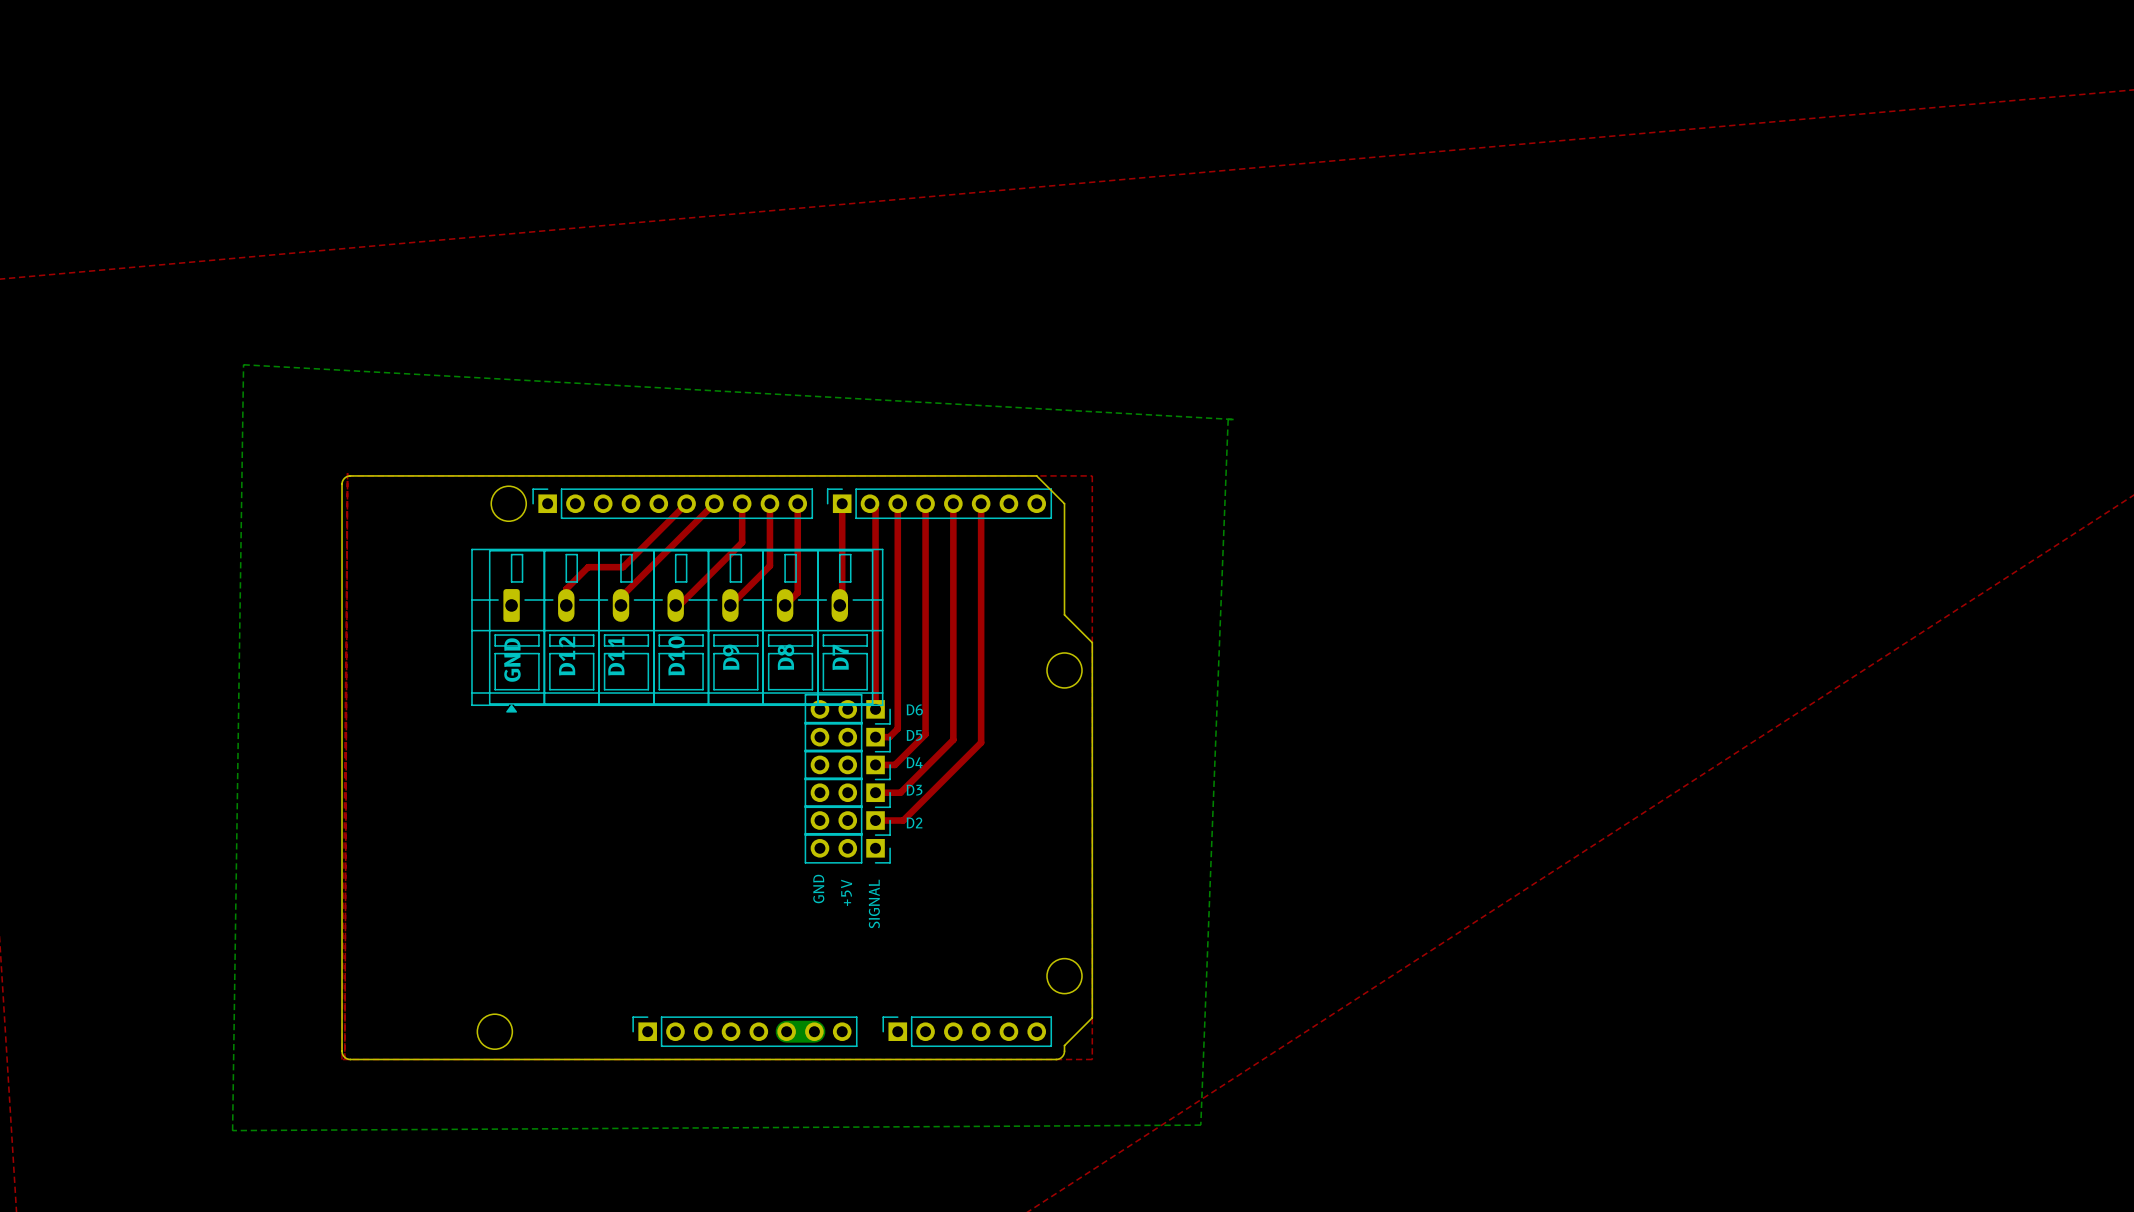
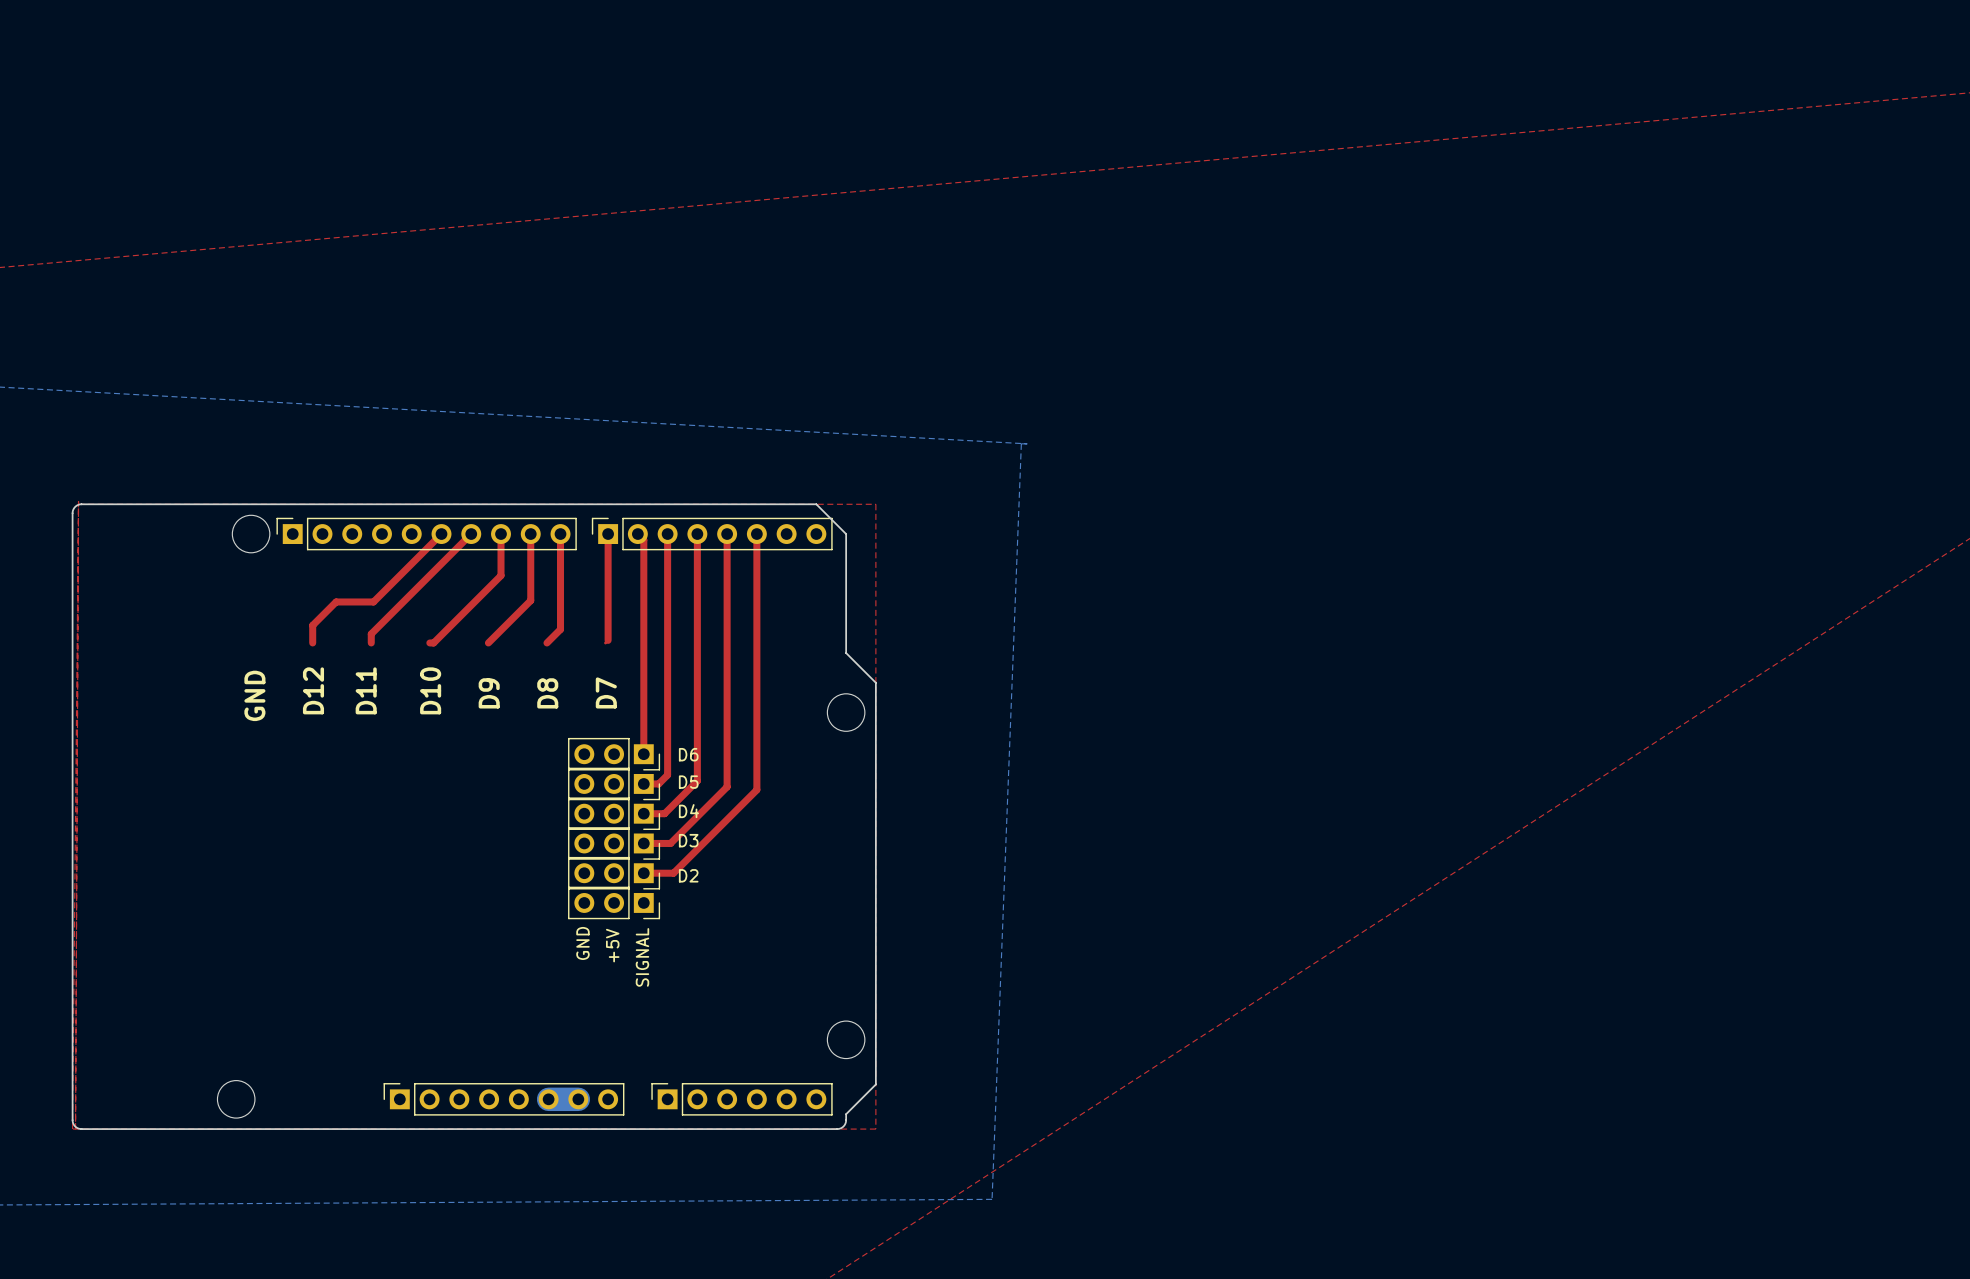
part: (677, 630) -> none

